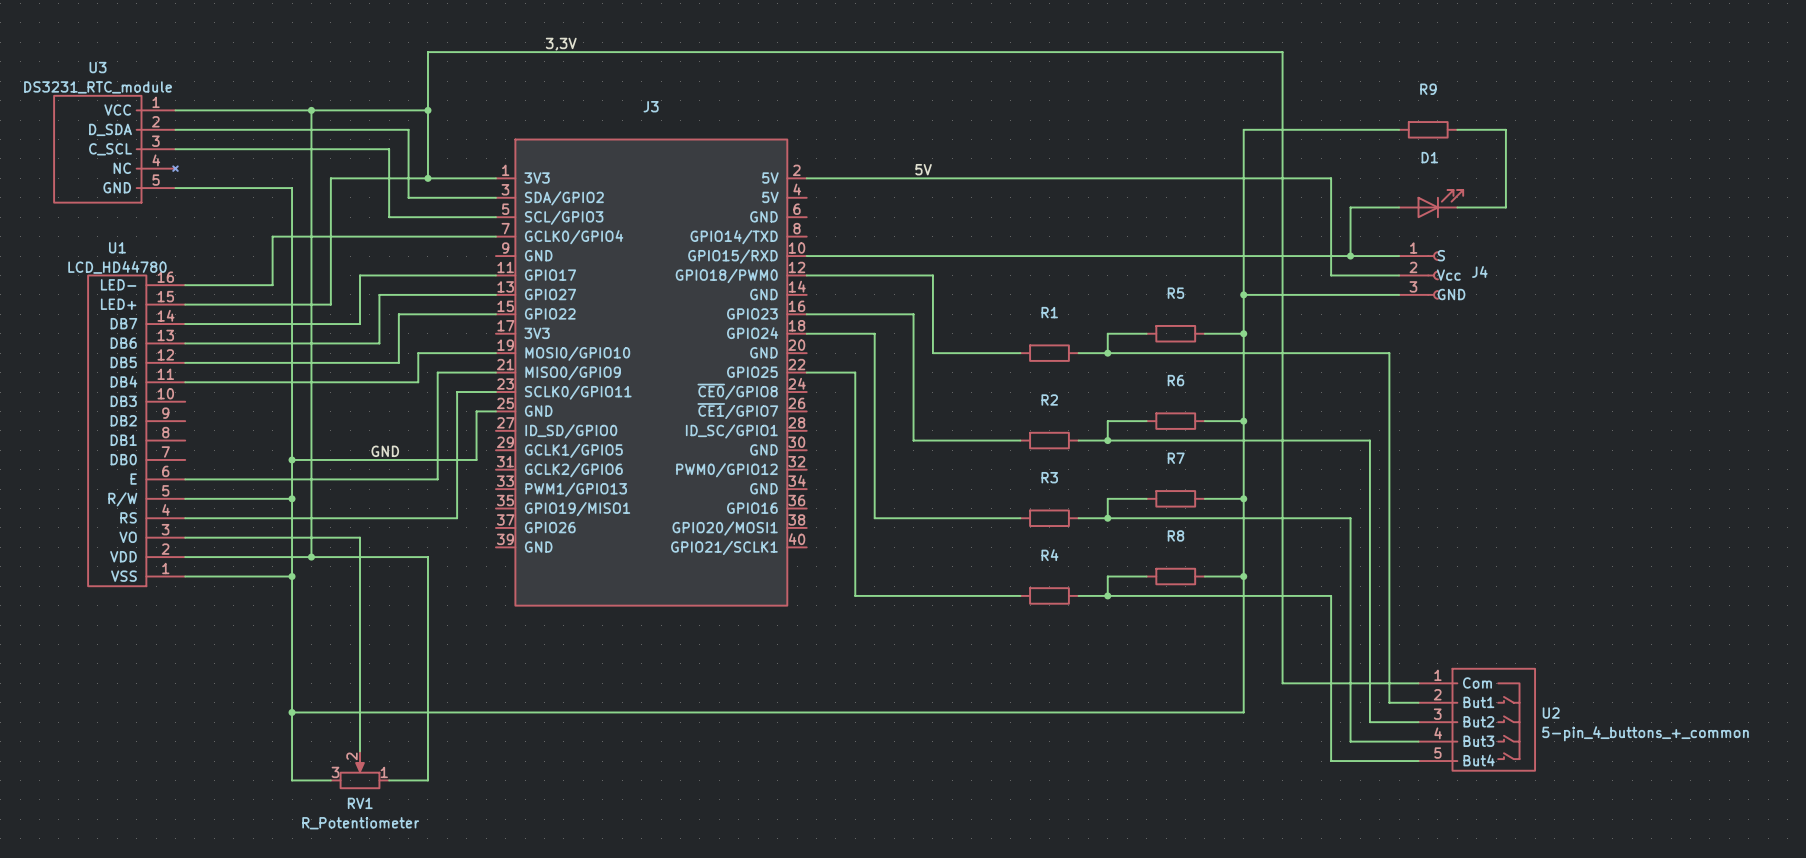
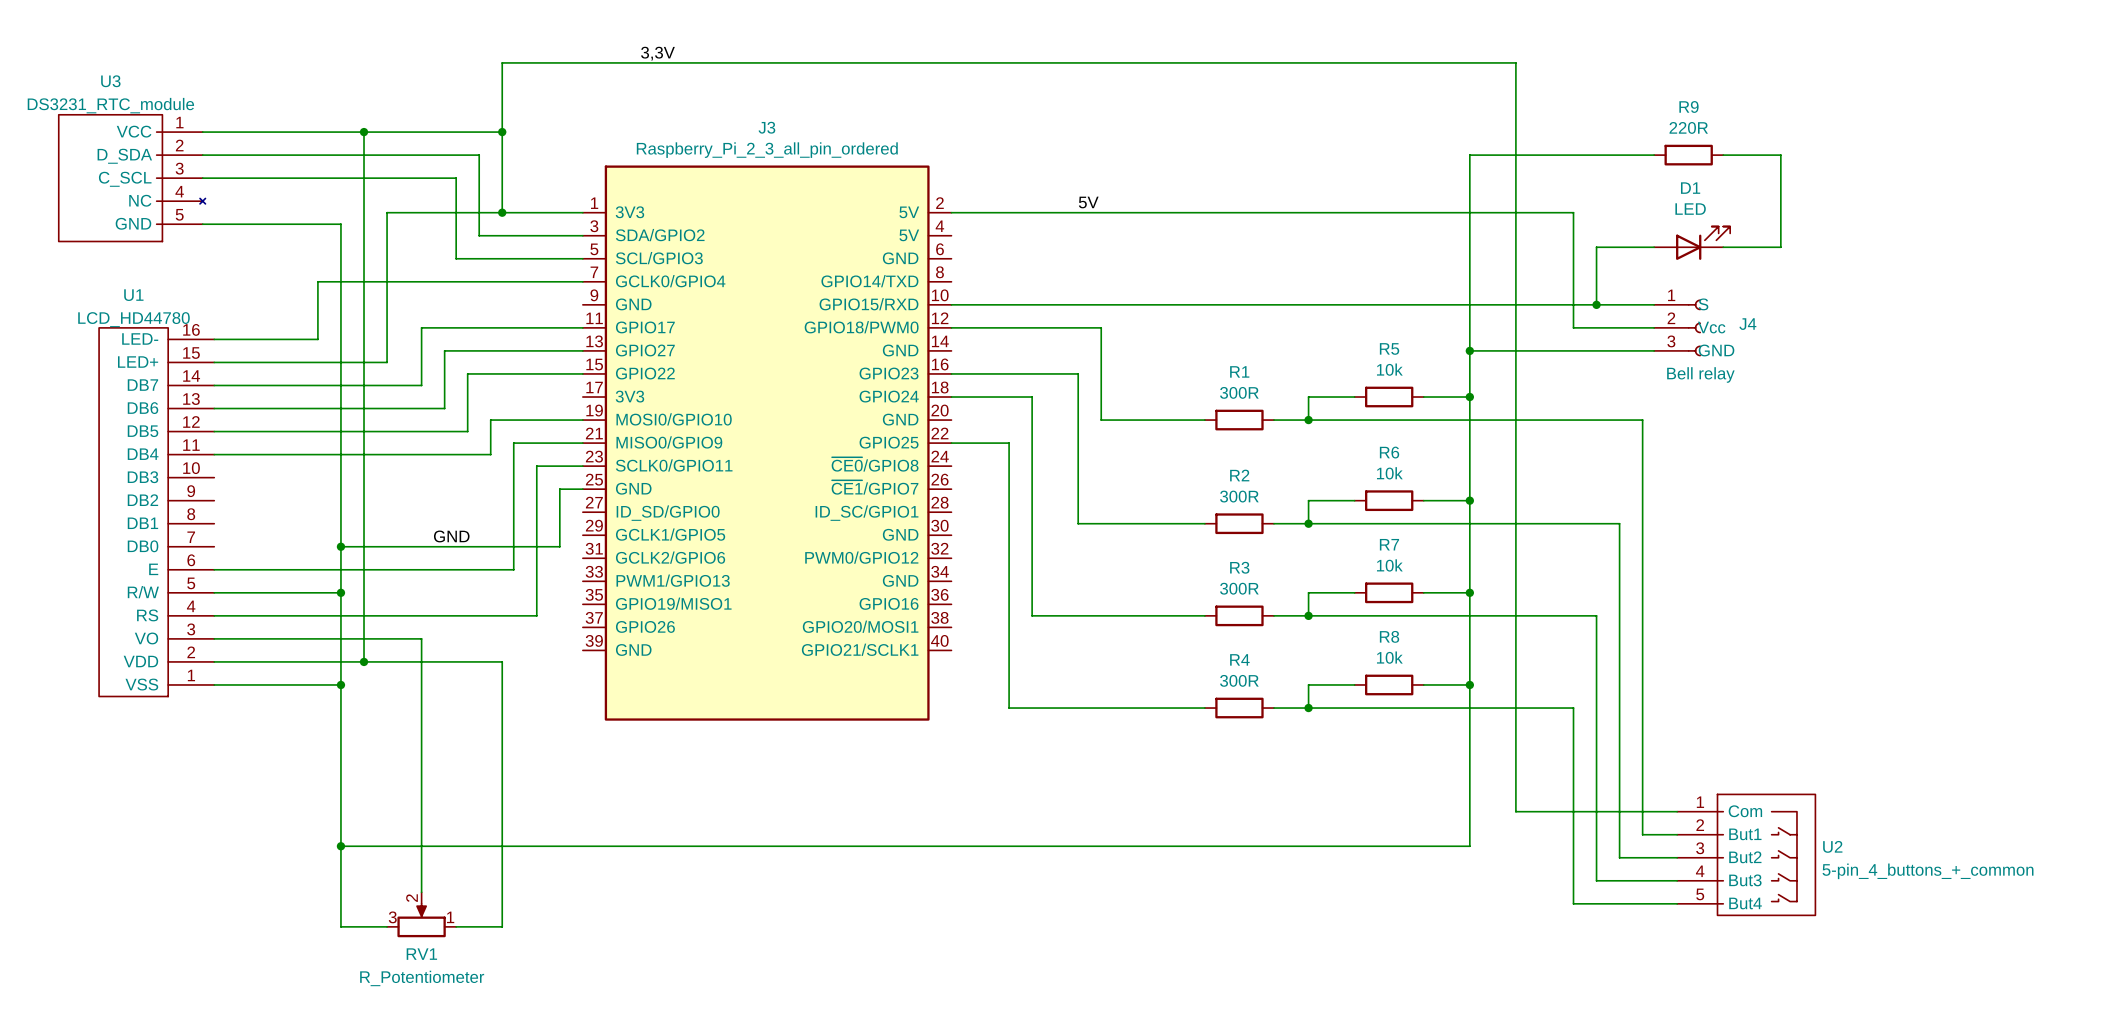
R9 value: none -> 220R (1688, 127)
J3 value: none -> Raspberry_Pi_2_3_all_pin_ordered (767, 150)
D1 value: none -> LED (1690, 209)
R5 value: none -> 10k (1389, 369)
J4 value: none -> Bell relay (1700, 374)
R1 value: none -> 300R (1239, 392)
R6 value: none -> 10k (1389, 473)
R2 value: none -> 300R (1239, 496)
R7 value: none -> 10k (1389, 565)
R3 value: none -> 300R (1239, 588)
R8 value: none -> 10k (1389, 657)
R4 value: none -> 300R (1239, 680)

